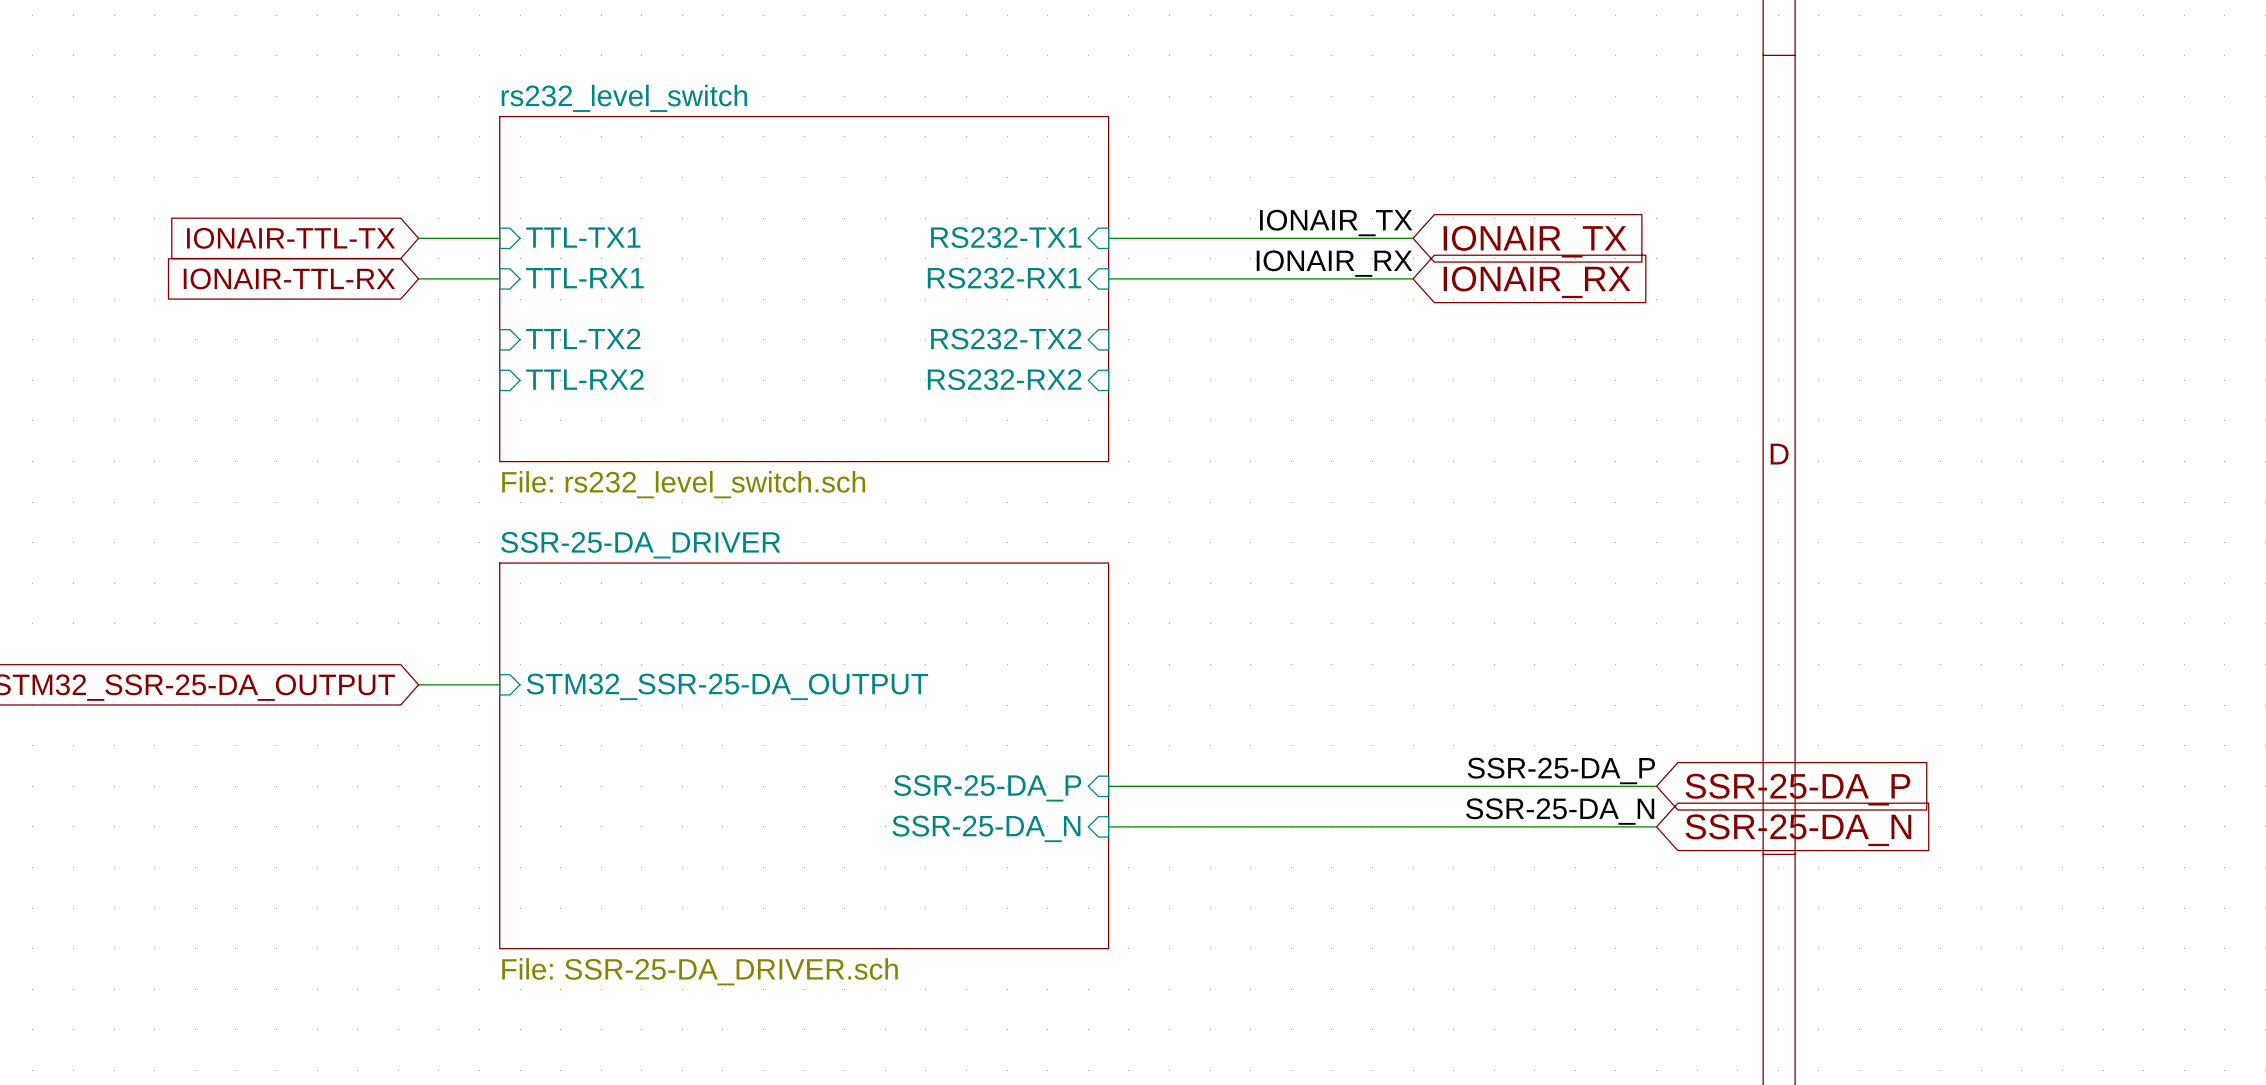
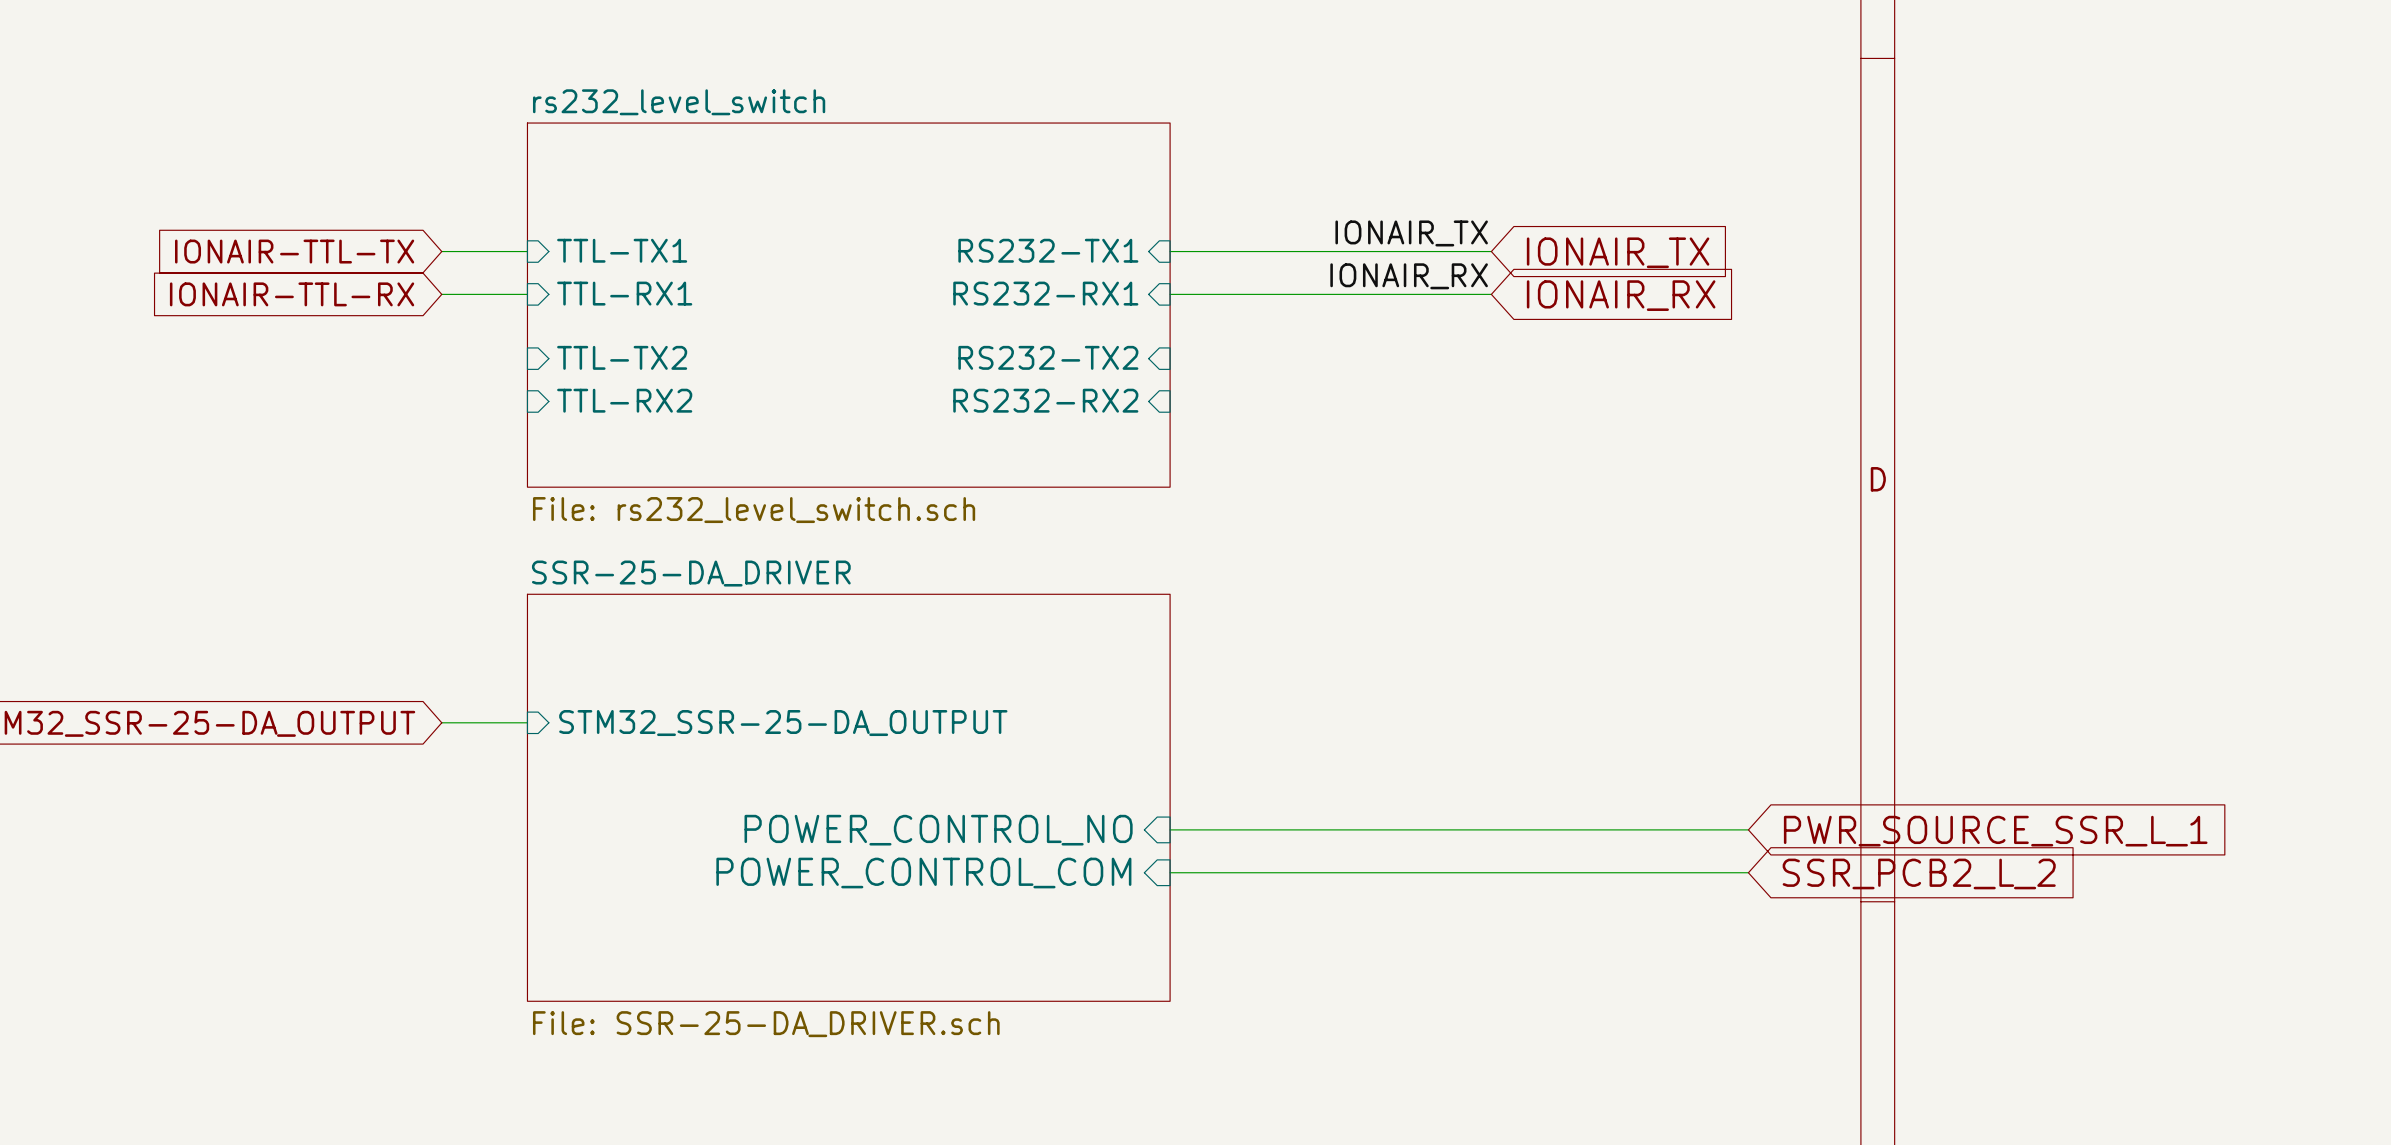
label: SSR-25-DA_P (1561, 770) -> none
sheet pin: SSR-25-DA_P (987, 788) -> POWER_CONTROL_NO (938, 830)
global label: SSR-25-DA_P (1797, 789) -> PWR_SOURCE_SSR_L_1 (1995, 831)
label: SSR-25-DA_N (1560, 811) -> none
sheet pin: SSR-25-DA_N (986, 828) -> POWER_CONTROL_COM (923, 873)
global label: SSR-25-DA_N (1798, 830) -> SSR_PCB2_L_2 (1919, 873)

